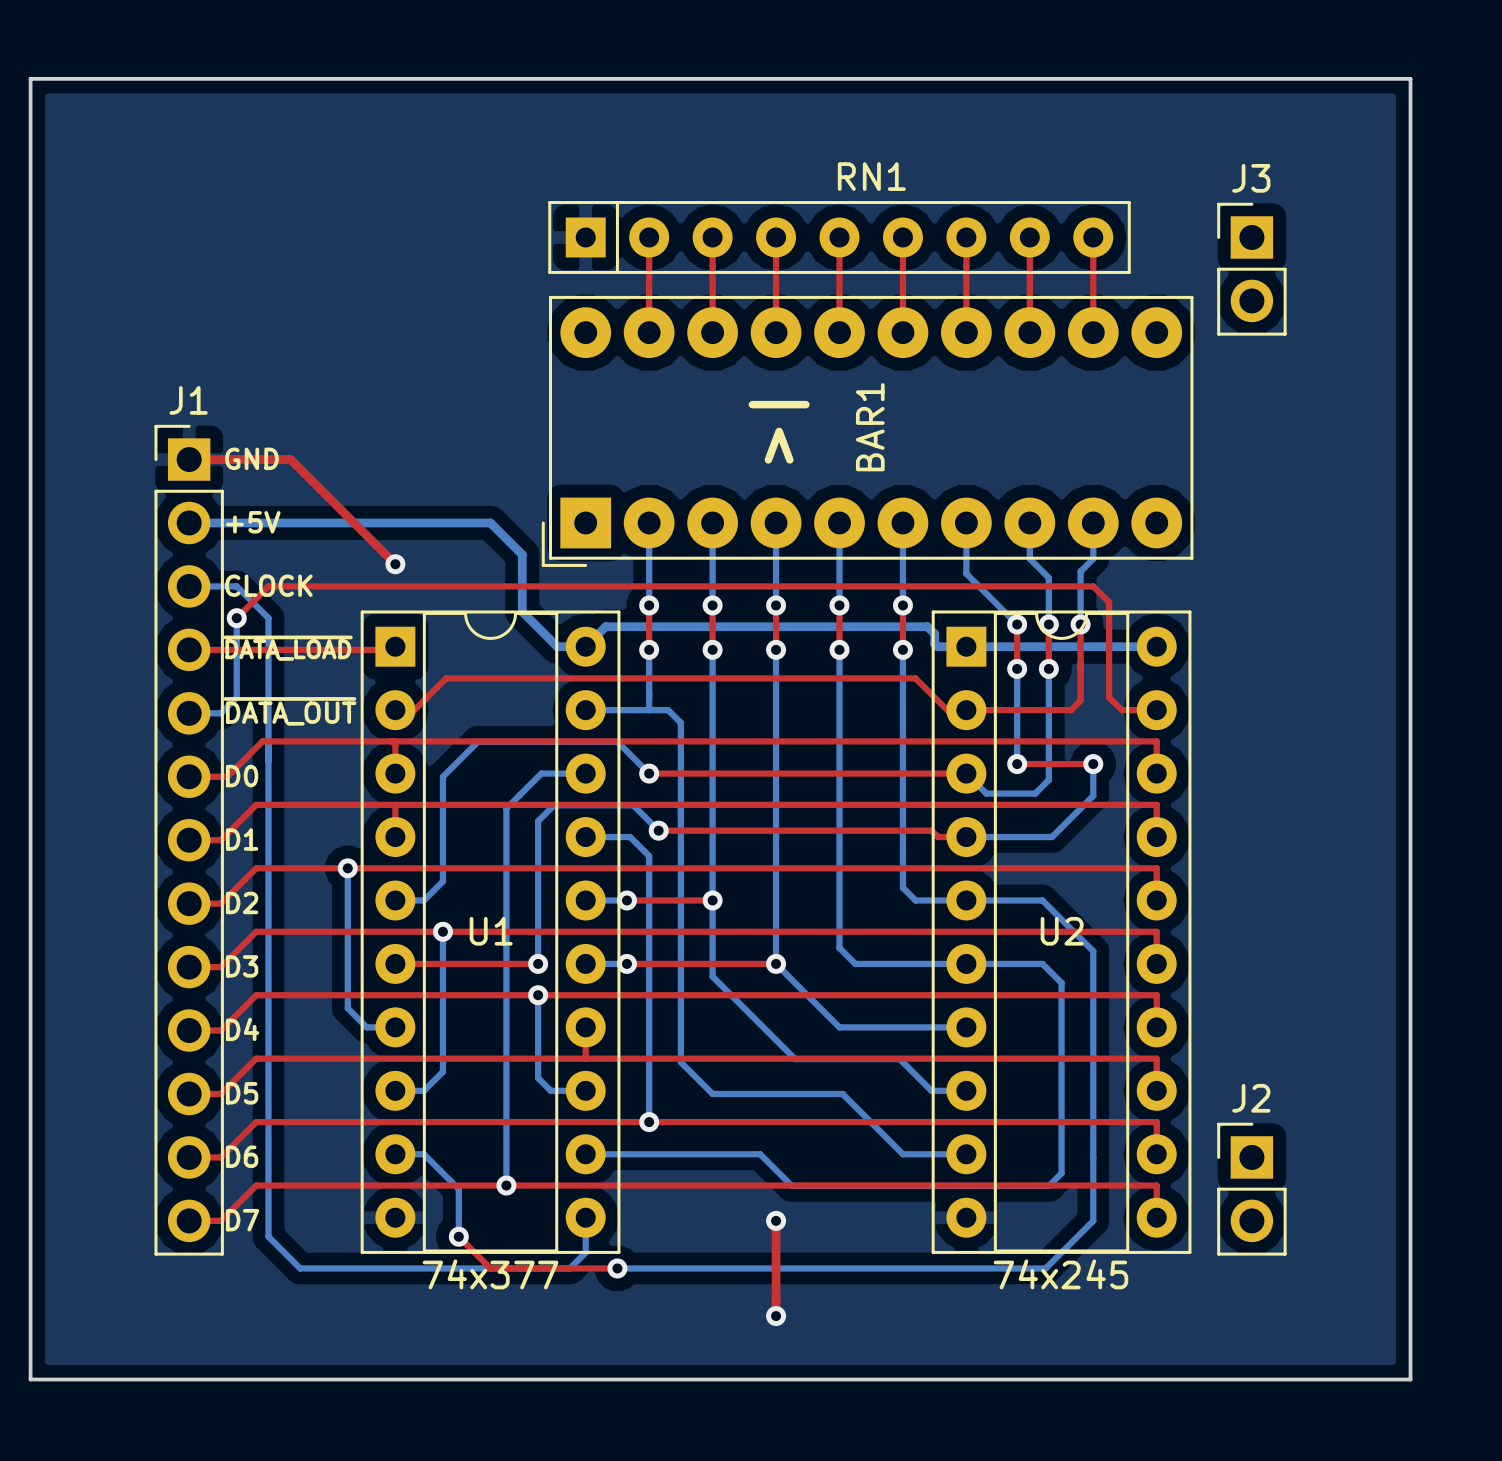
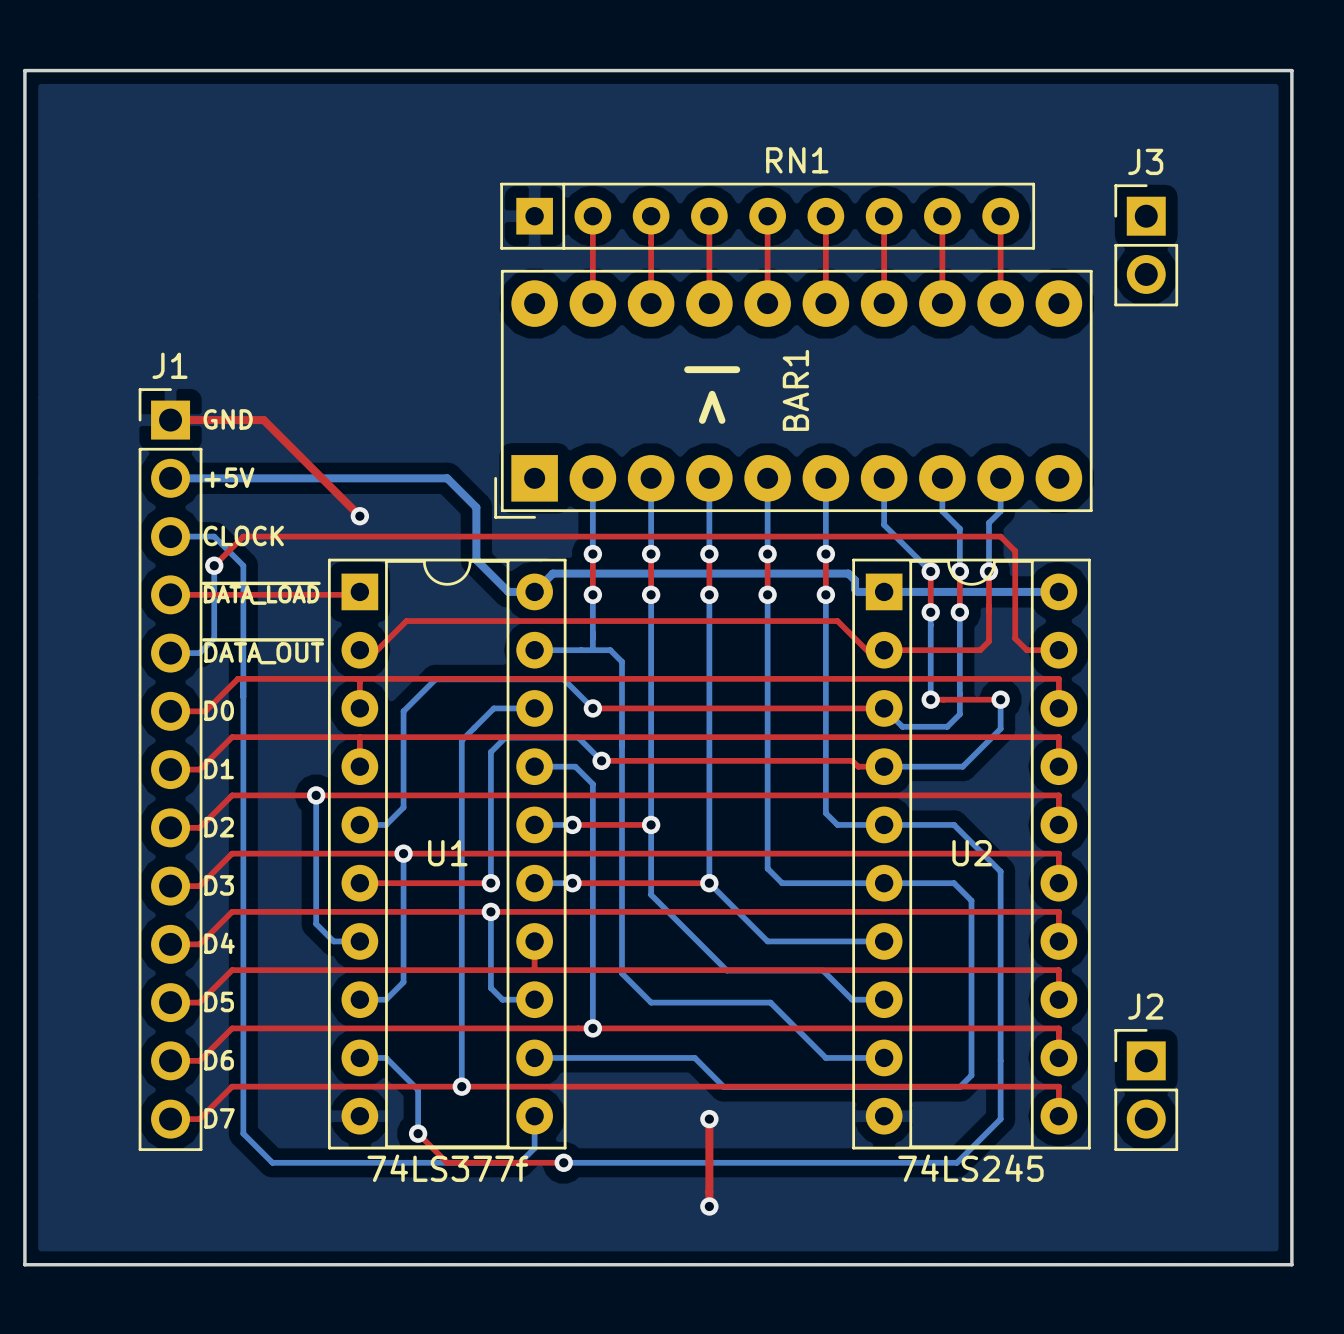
U1 value: 74x377 (490, 1274) -> 74LS377f (447, 1168)
U2 value: 74x245 (1060, 1274) -> 74LS245 (970, 1168)

